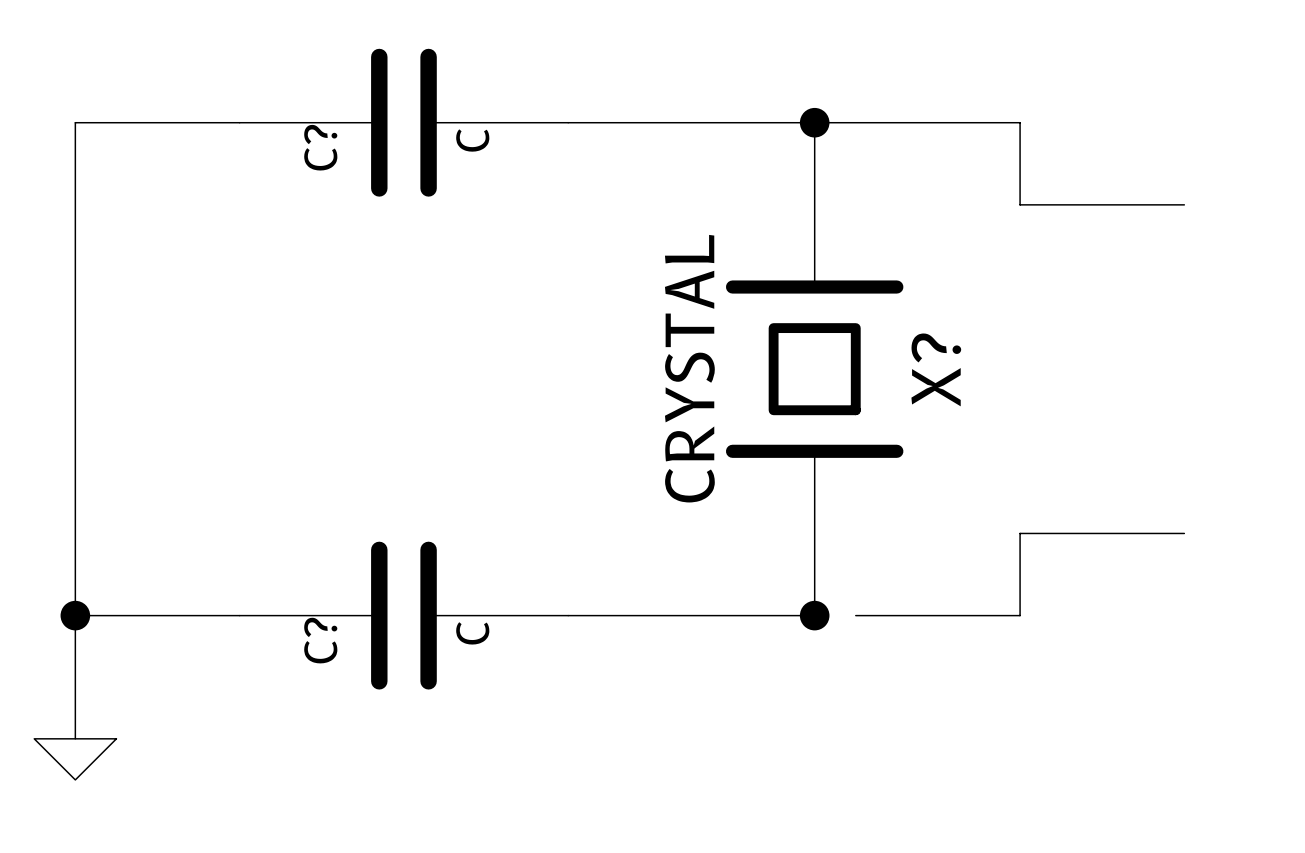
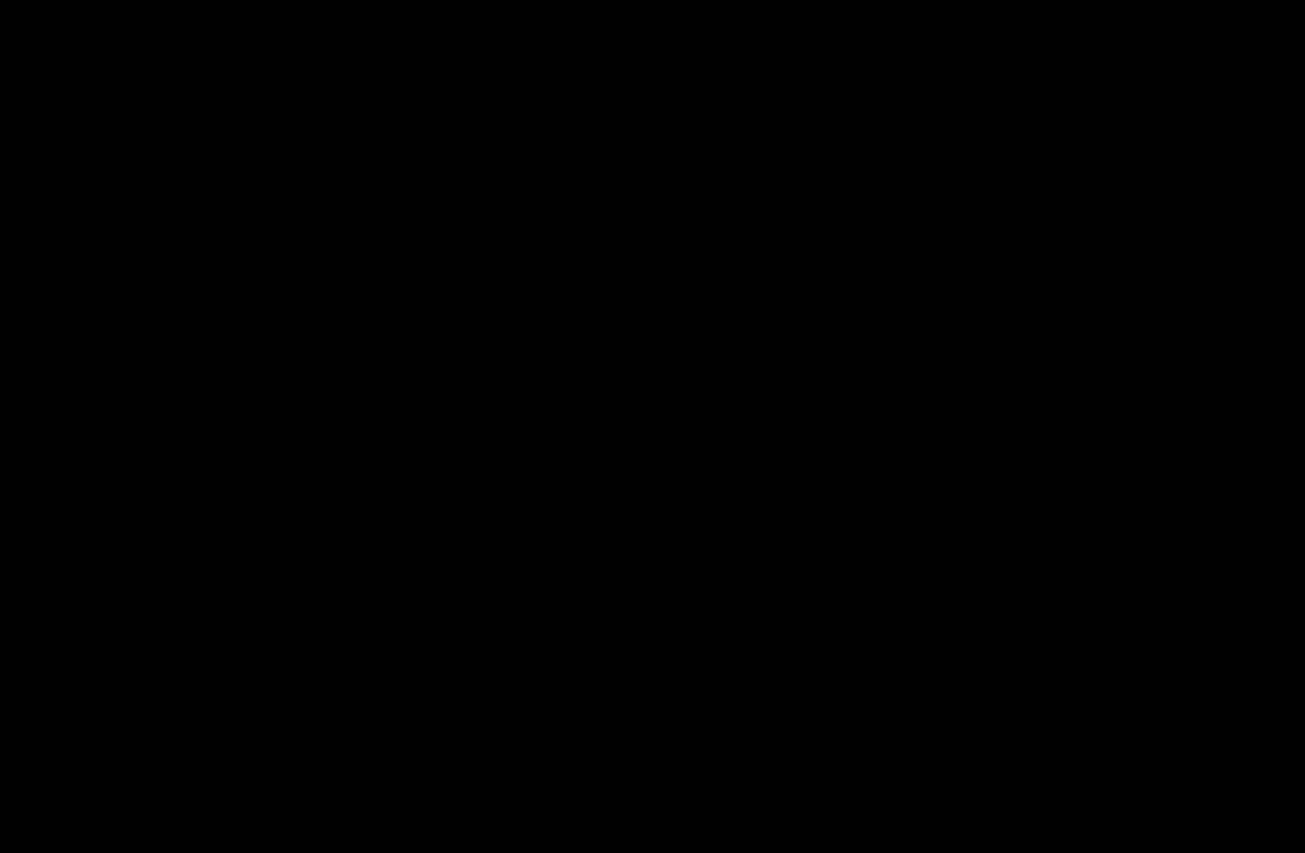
wire: (239, 122) (75, 122) (75, 738) -> none
C?: C (403, 122) -> none
wire: (568, 122) (1020, 122) (1020, 204) (1184, 204) -> none
junction: (814, 122) -> none
X?: CRYSTAL (814, 369) -> none
wire: (1184, 533) (1020, 533) (1020, 615) (855, 615) -> none
wire: (75, 615) (239, 615) -> none
junction: (75, 615) -> none
C?: C (403, 615) -> none
wire: (568, 615) (814, 615) -> none
junction: (814, 615) -> none
power symbol: (75, 759) -> none

